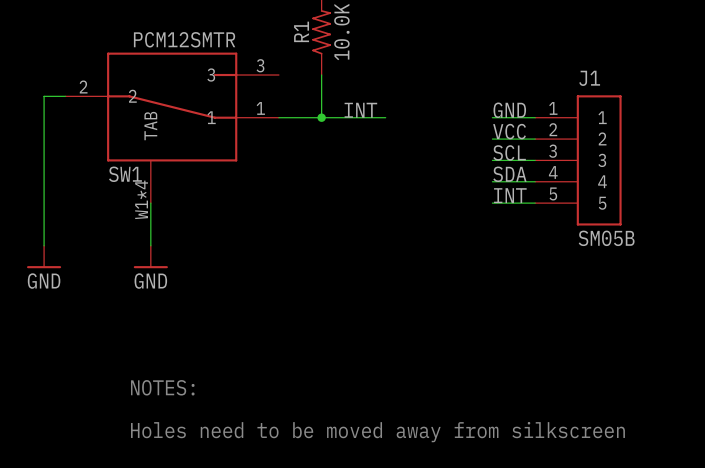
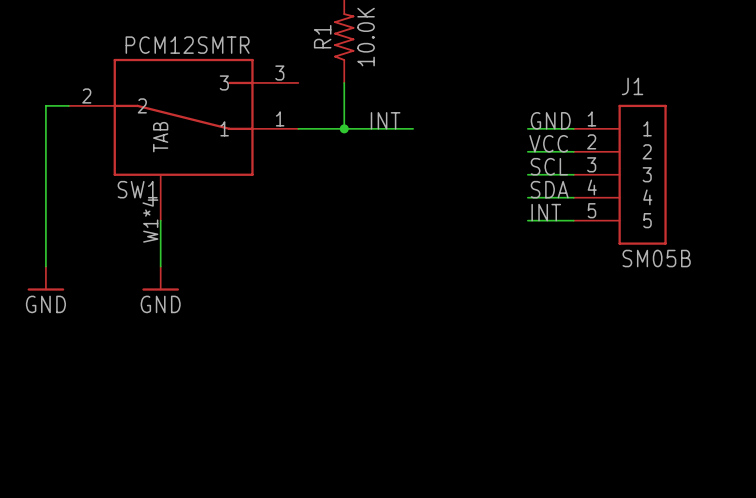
text: NOTES: (162, 387) -> none
text: Holes need to be moved away from silkscreen (377, 432) -> none

